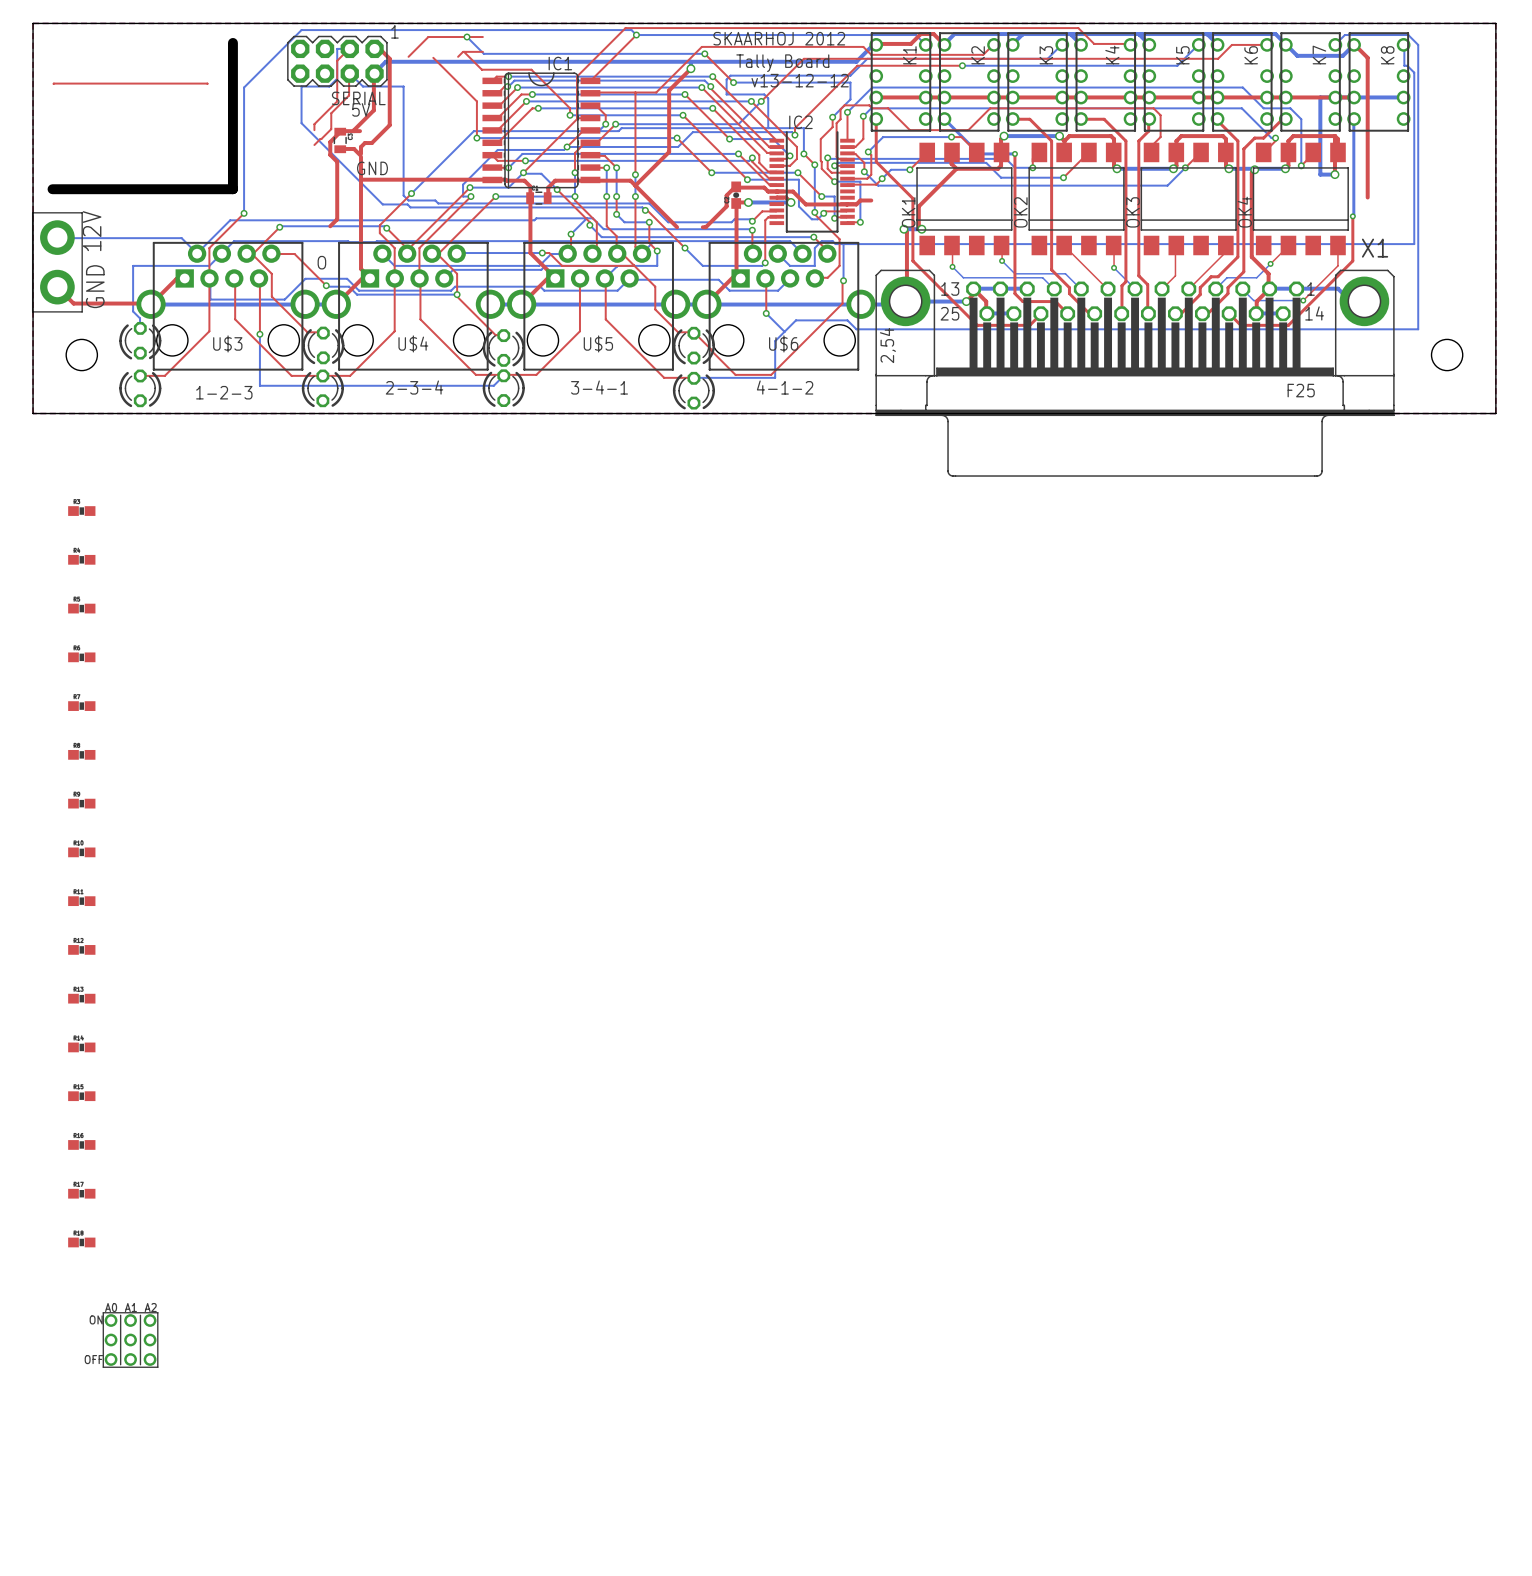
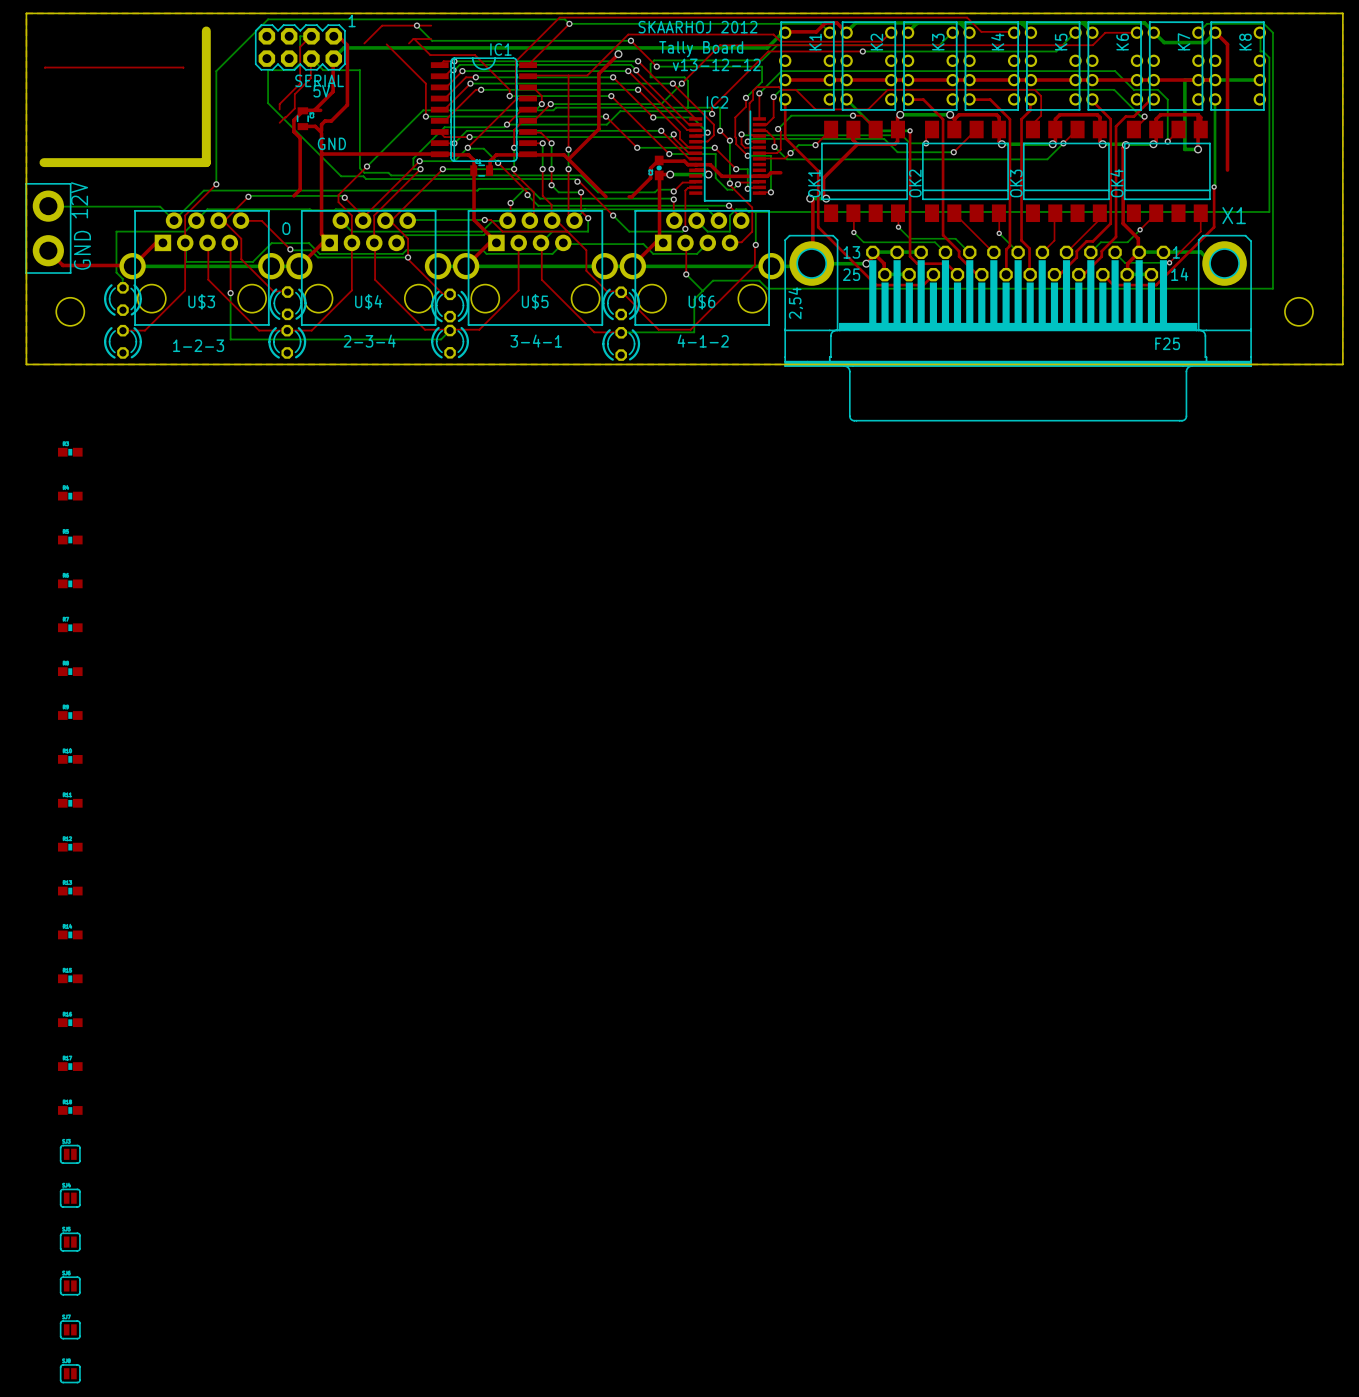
part: none -> (70, 1154)
part: none -> (70, 1198)
part: (130, 1340) -> none
part: none -> (70, 1242)
part: none -> (70, 1285)
part: none -> (70, 1329)
part: none -> (70, 1373)

